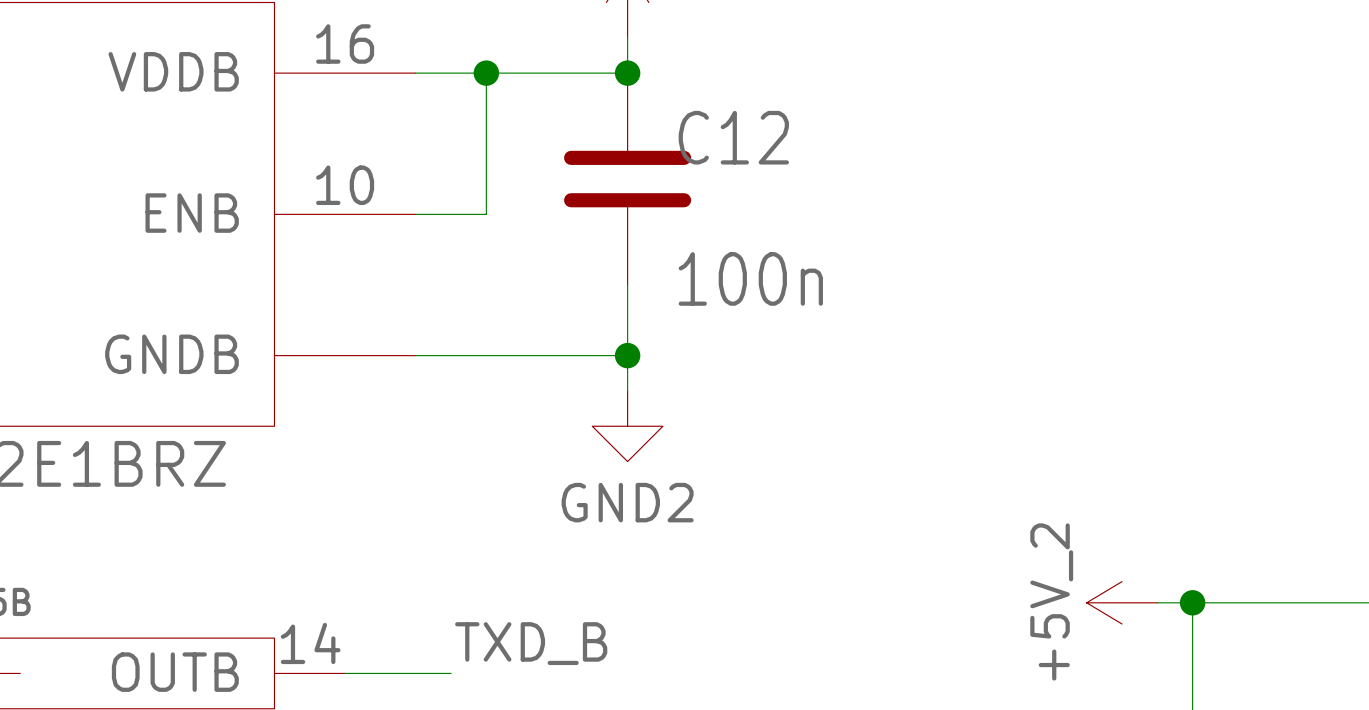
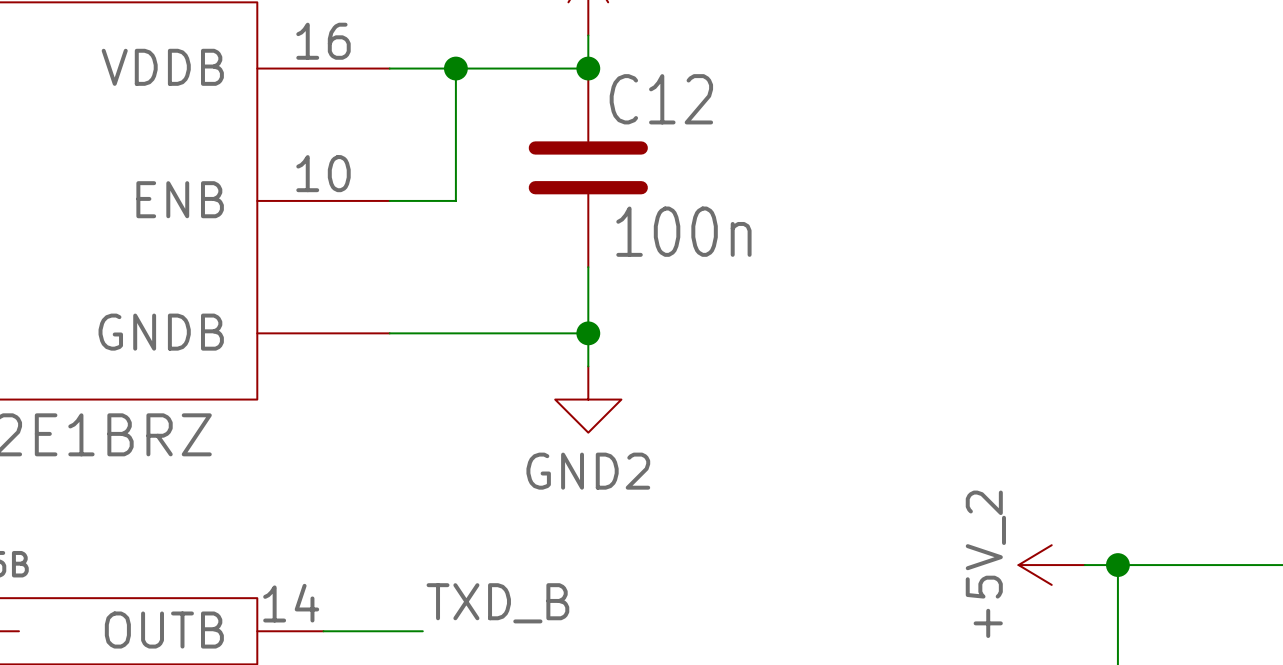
C12 name position: C12 (733, 137) -> C12 (661, 99)
C12 value position: 100n (750, 278) -> 100n (683, 231)

